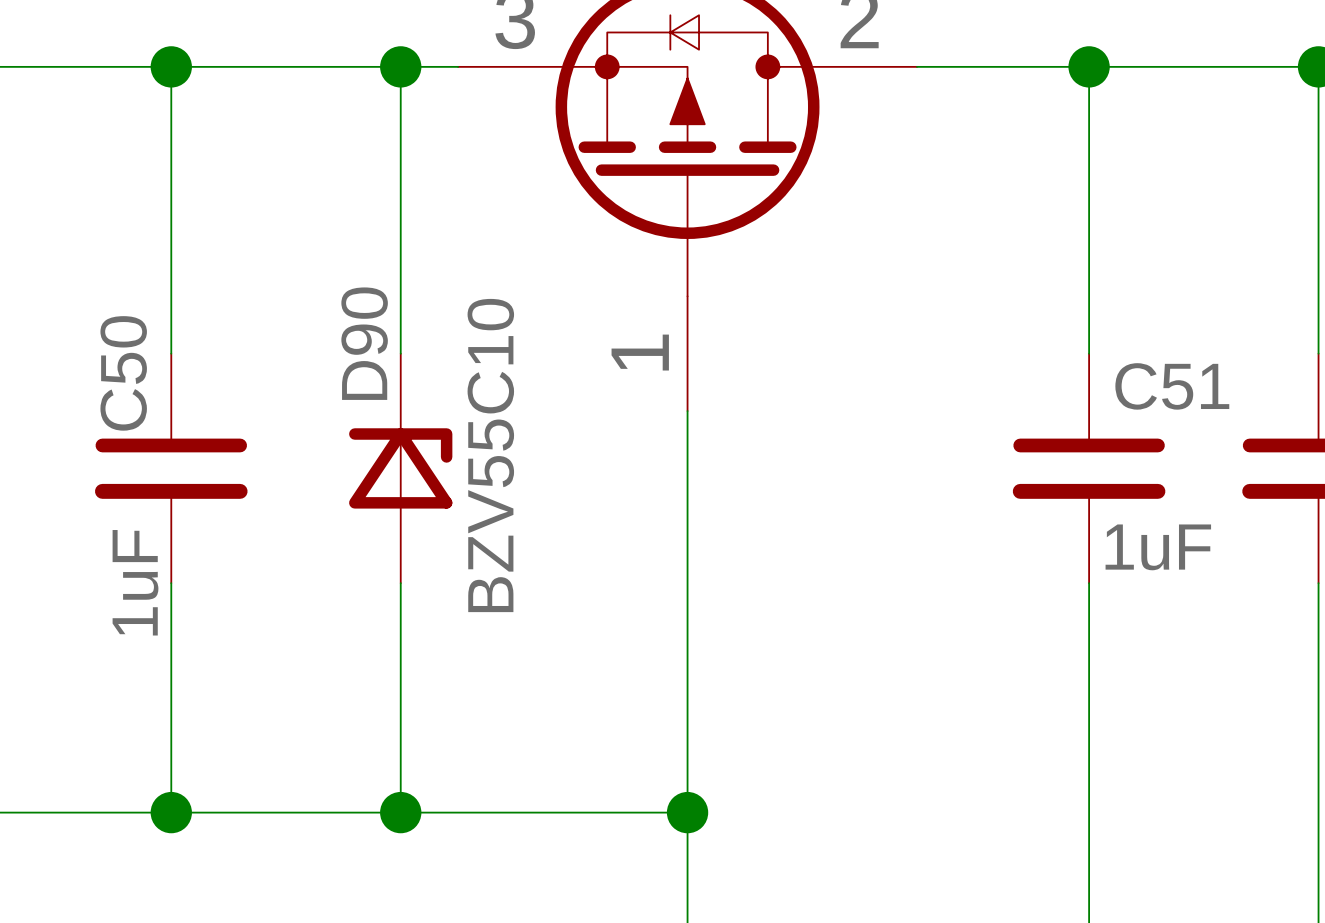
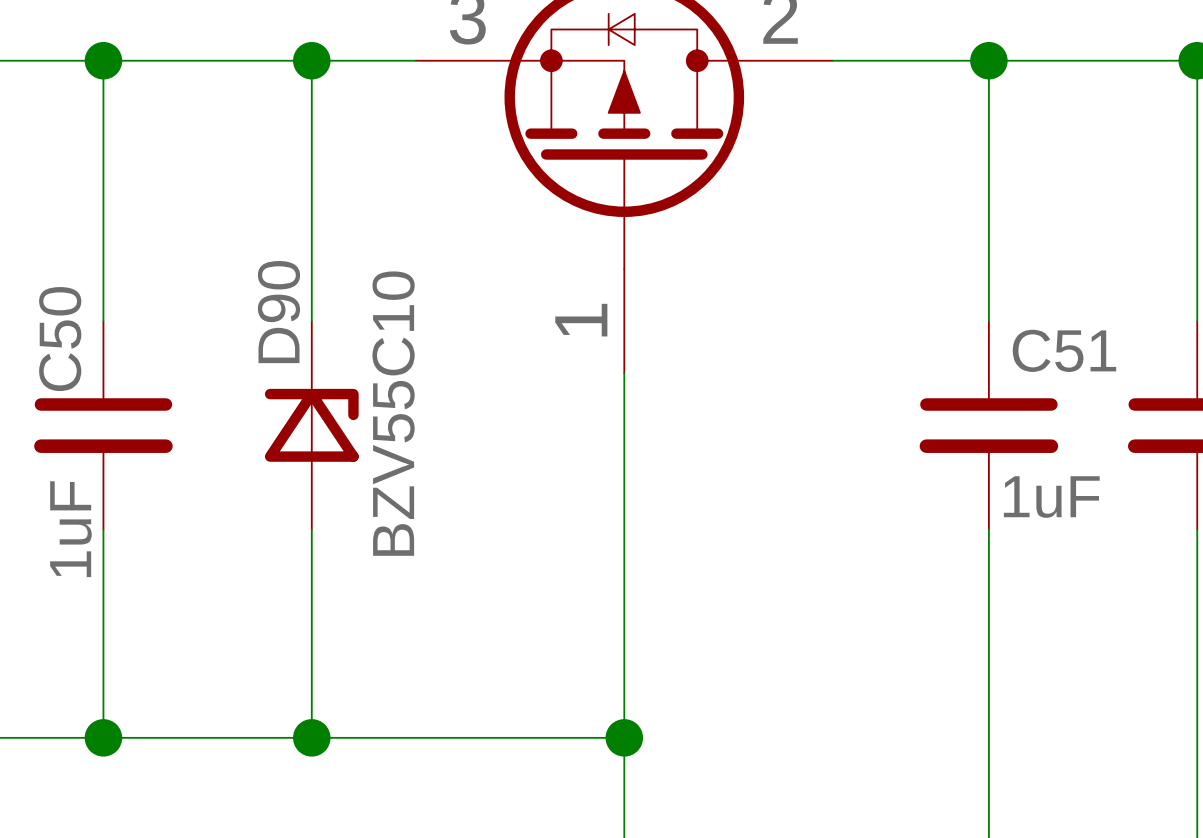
wire: (171, 66) (171, 353) -> (103, 60) (103, 321)
junction position: (171, 66) -> (103, 60)
wire: (400, 66) (400, 353) -> (311, 60) (311, 321)
junction position: (400, 66) -> (311, 60)
C50 position: (171, 468) -> (103, 425)
D90 position: (400, 468) -> (311, 425)
wire: (171, 583) (171, 812) -> (103, 529) (103, 737)
wire: (400, 583) (400, 812) -> (311, 529) (311, 737)
junction position: (171, 812) -> (103, 737)
junction position: (400, 812) -> (311, 737)

